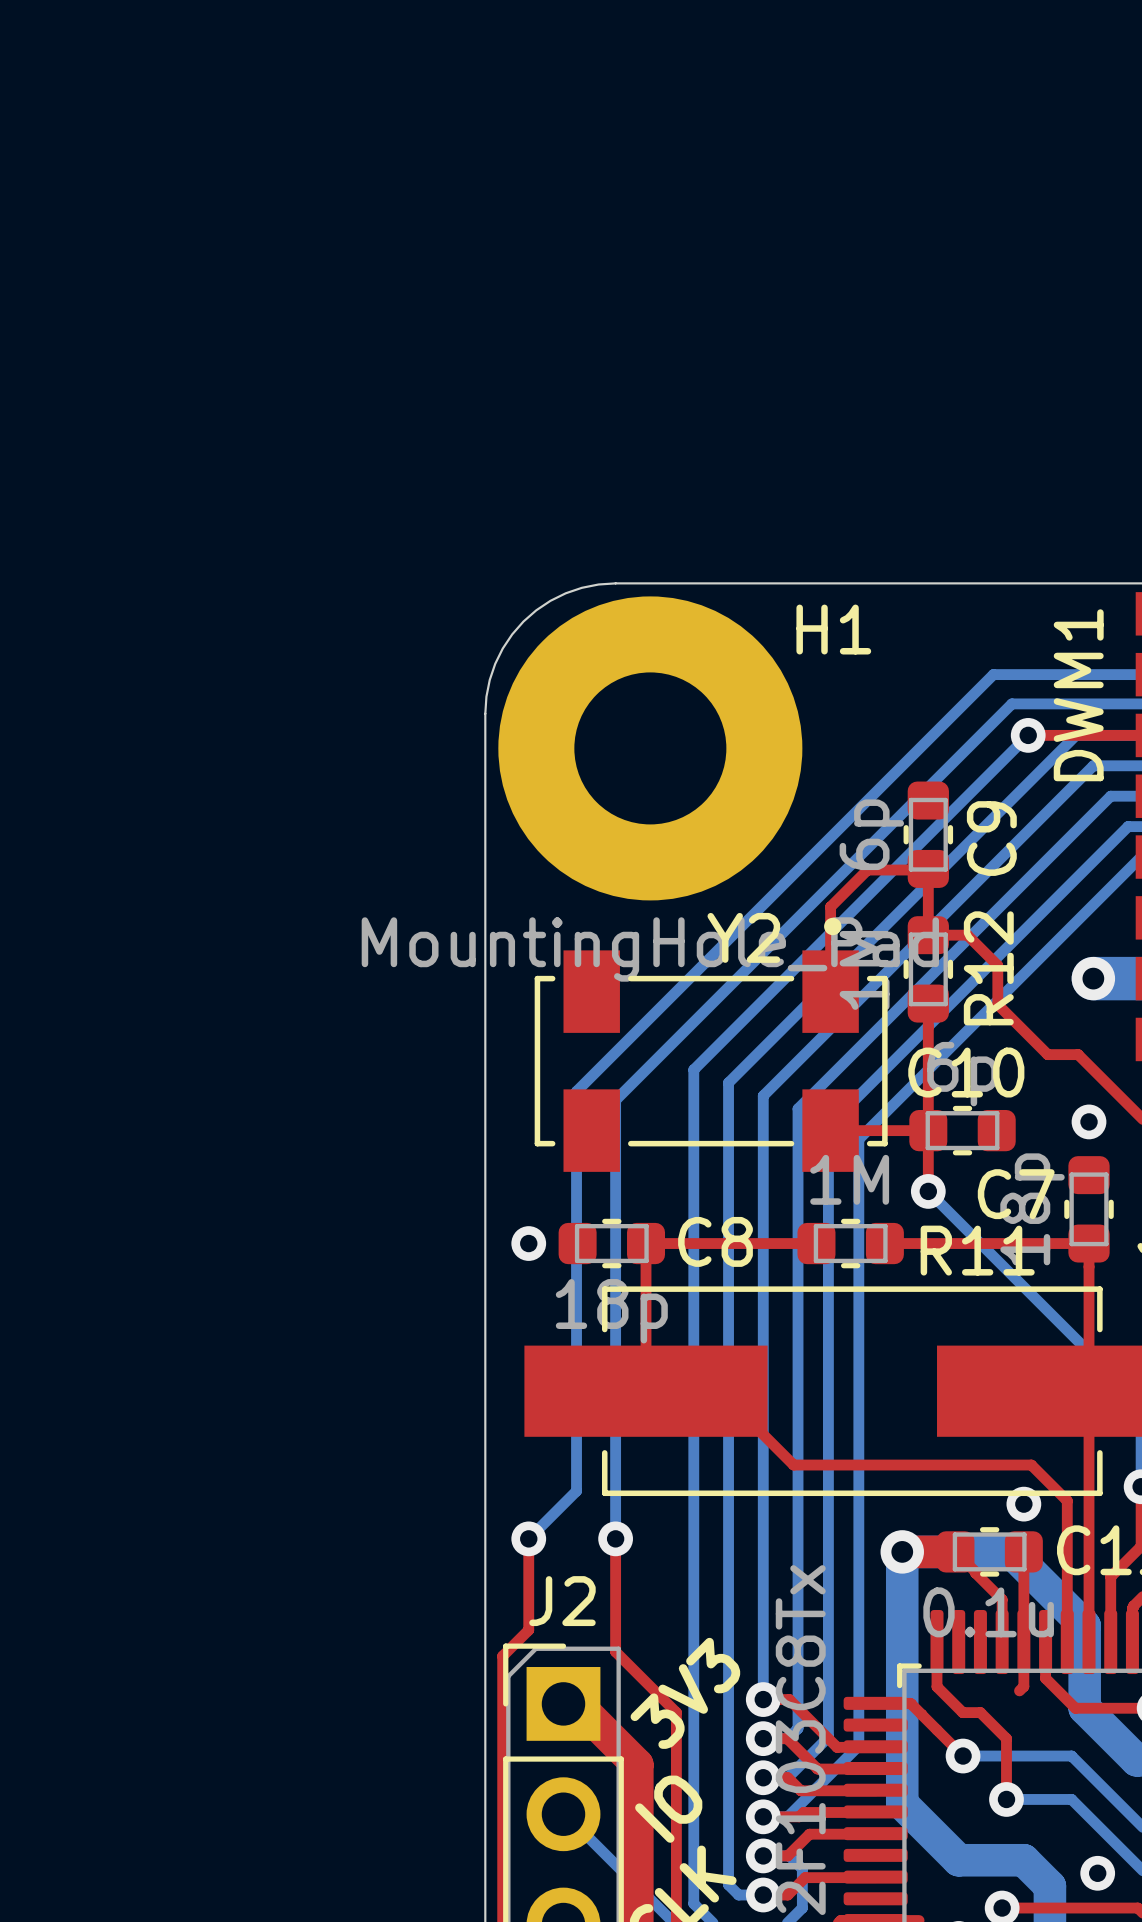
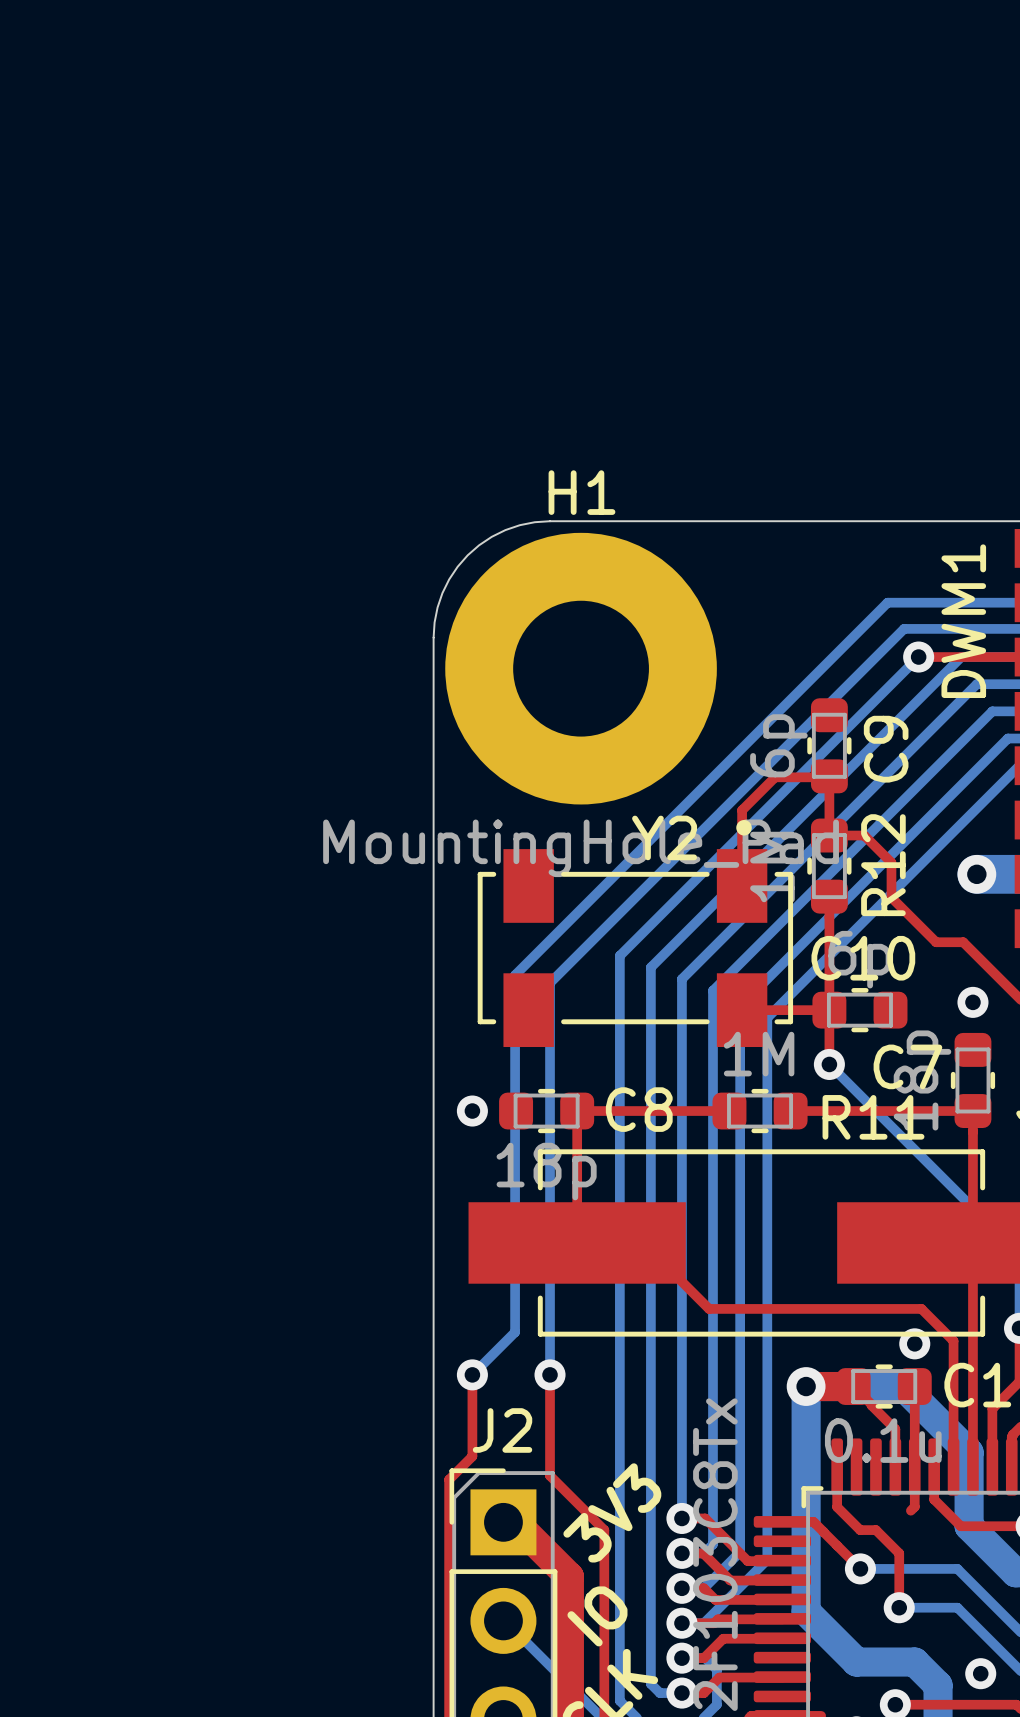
H1 name position: H1 (833, 629) -> H1 (581, 492)

